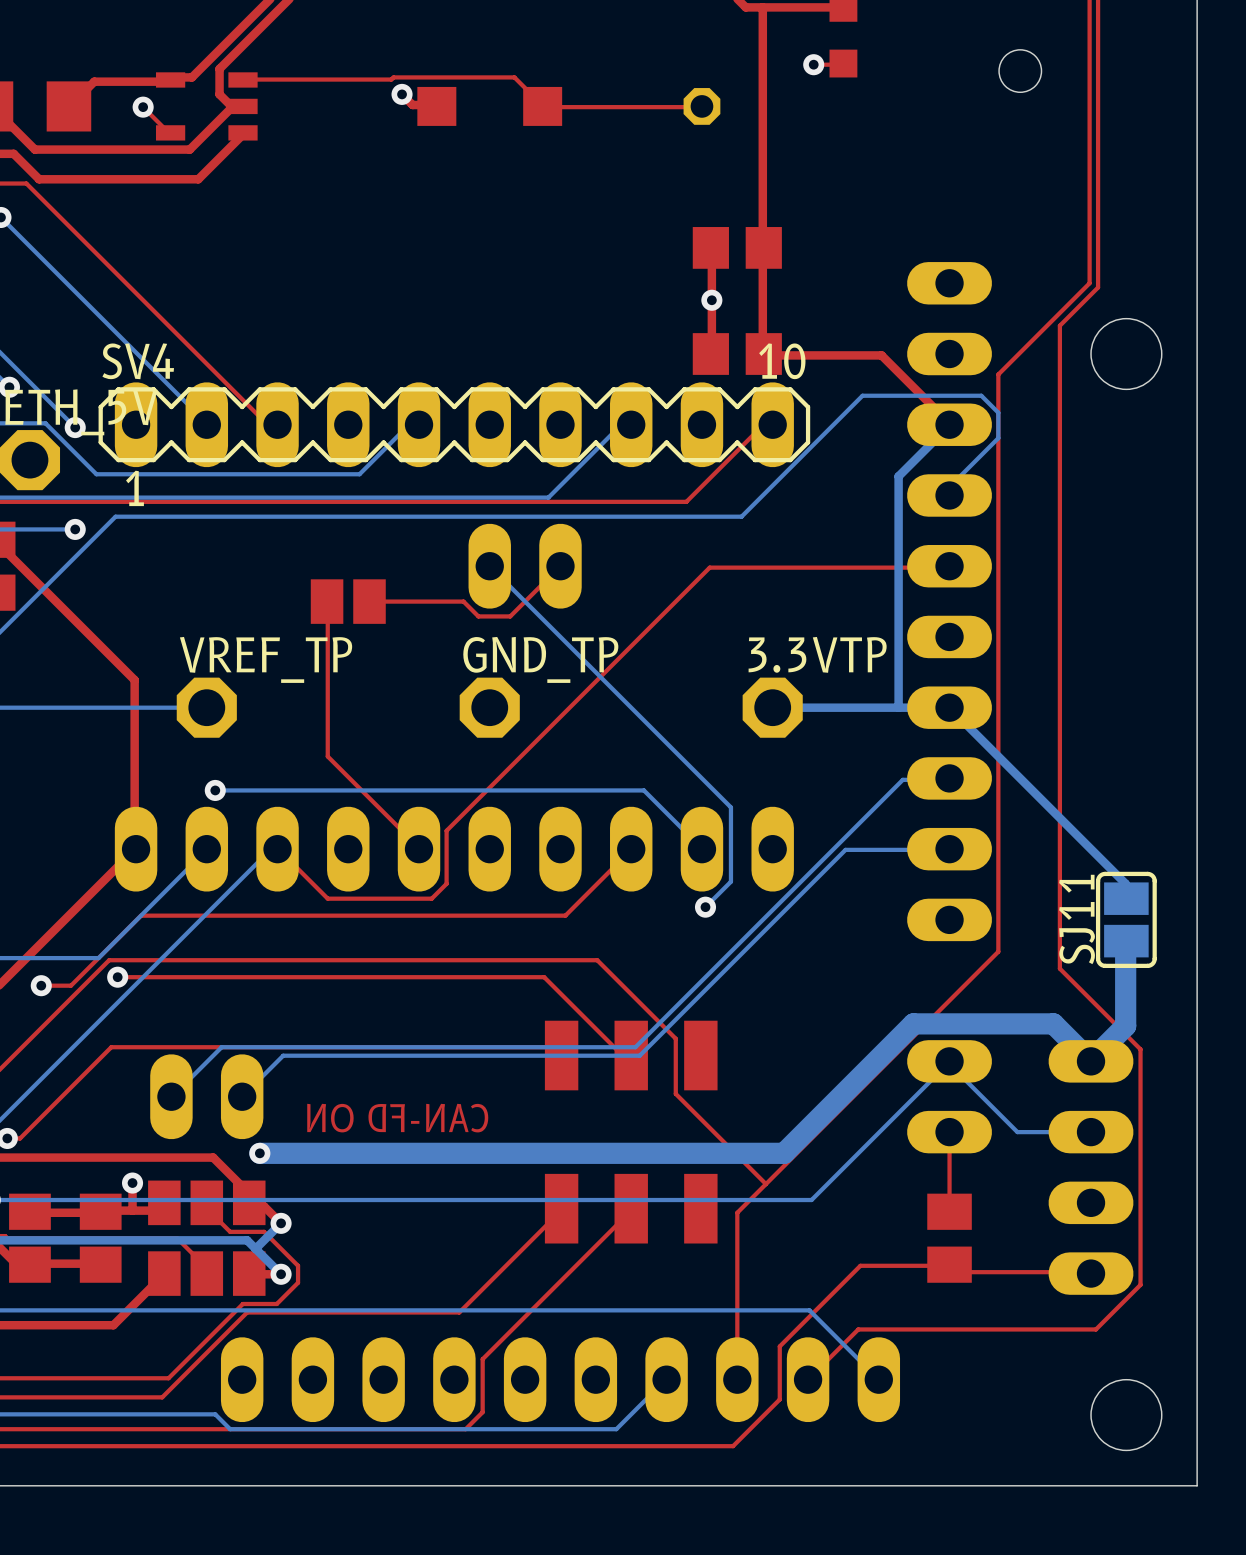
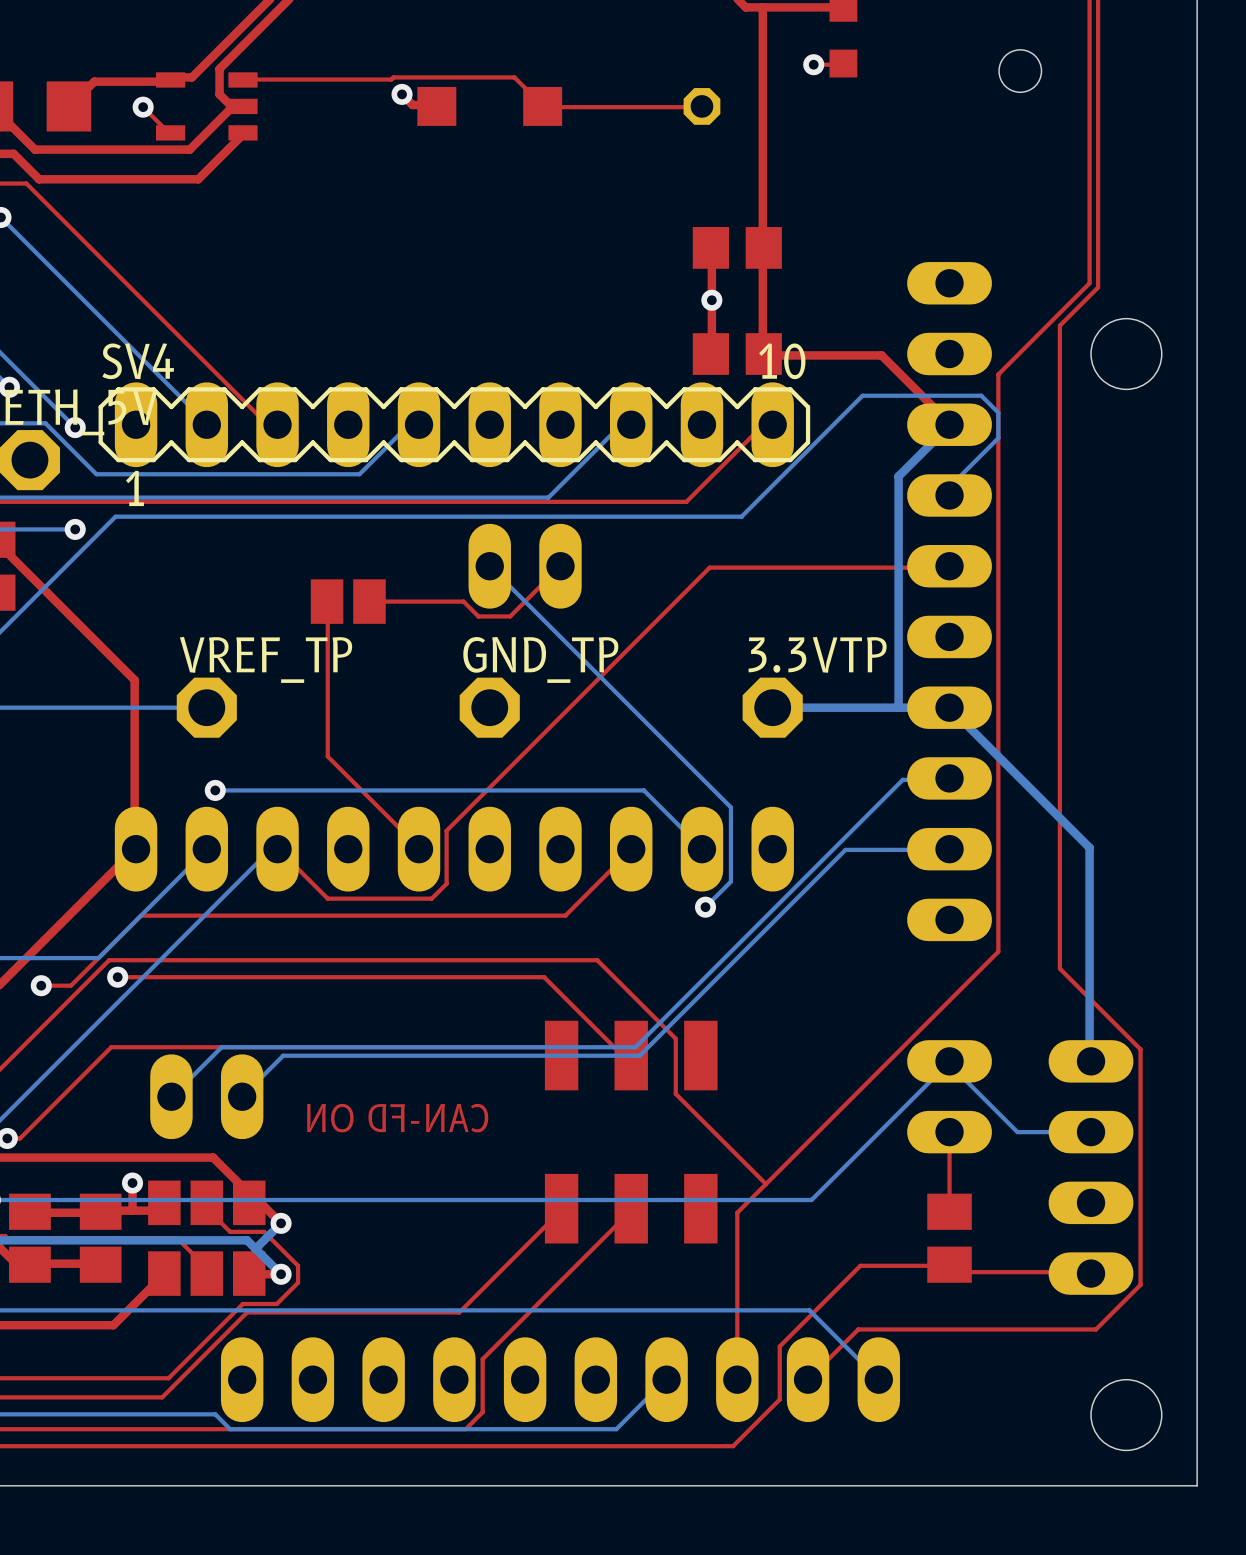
bottom track: (1089, 847) (1125, 883) (1126, 898) -> (1089, 847) (1089, 1059)
SJ11: (1126, 919) -> none
bottom track: (1126, 941) (1125, 1026) (1091, 1061) -> none
bottom track: (1089, 1059) (1053, 1023) (913, 1023) (784, 1153) (259, 1153) -> none
via: (259, 1153) -> none

